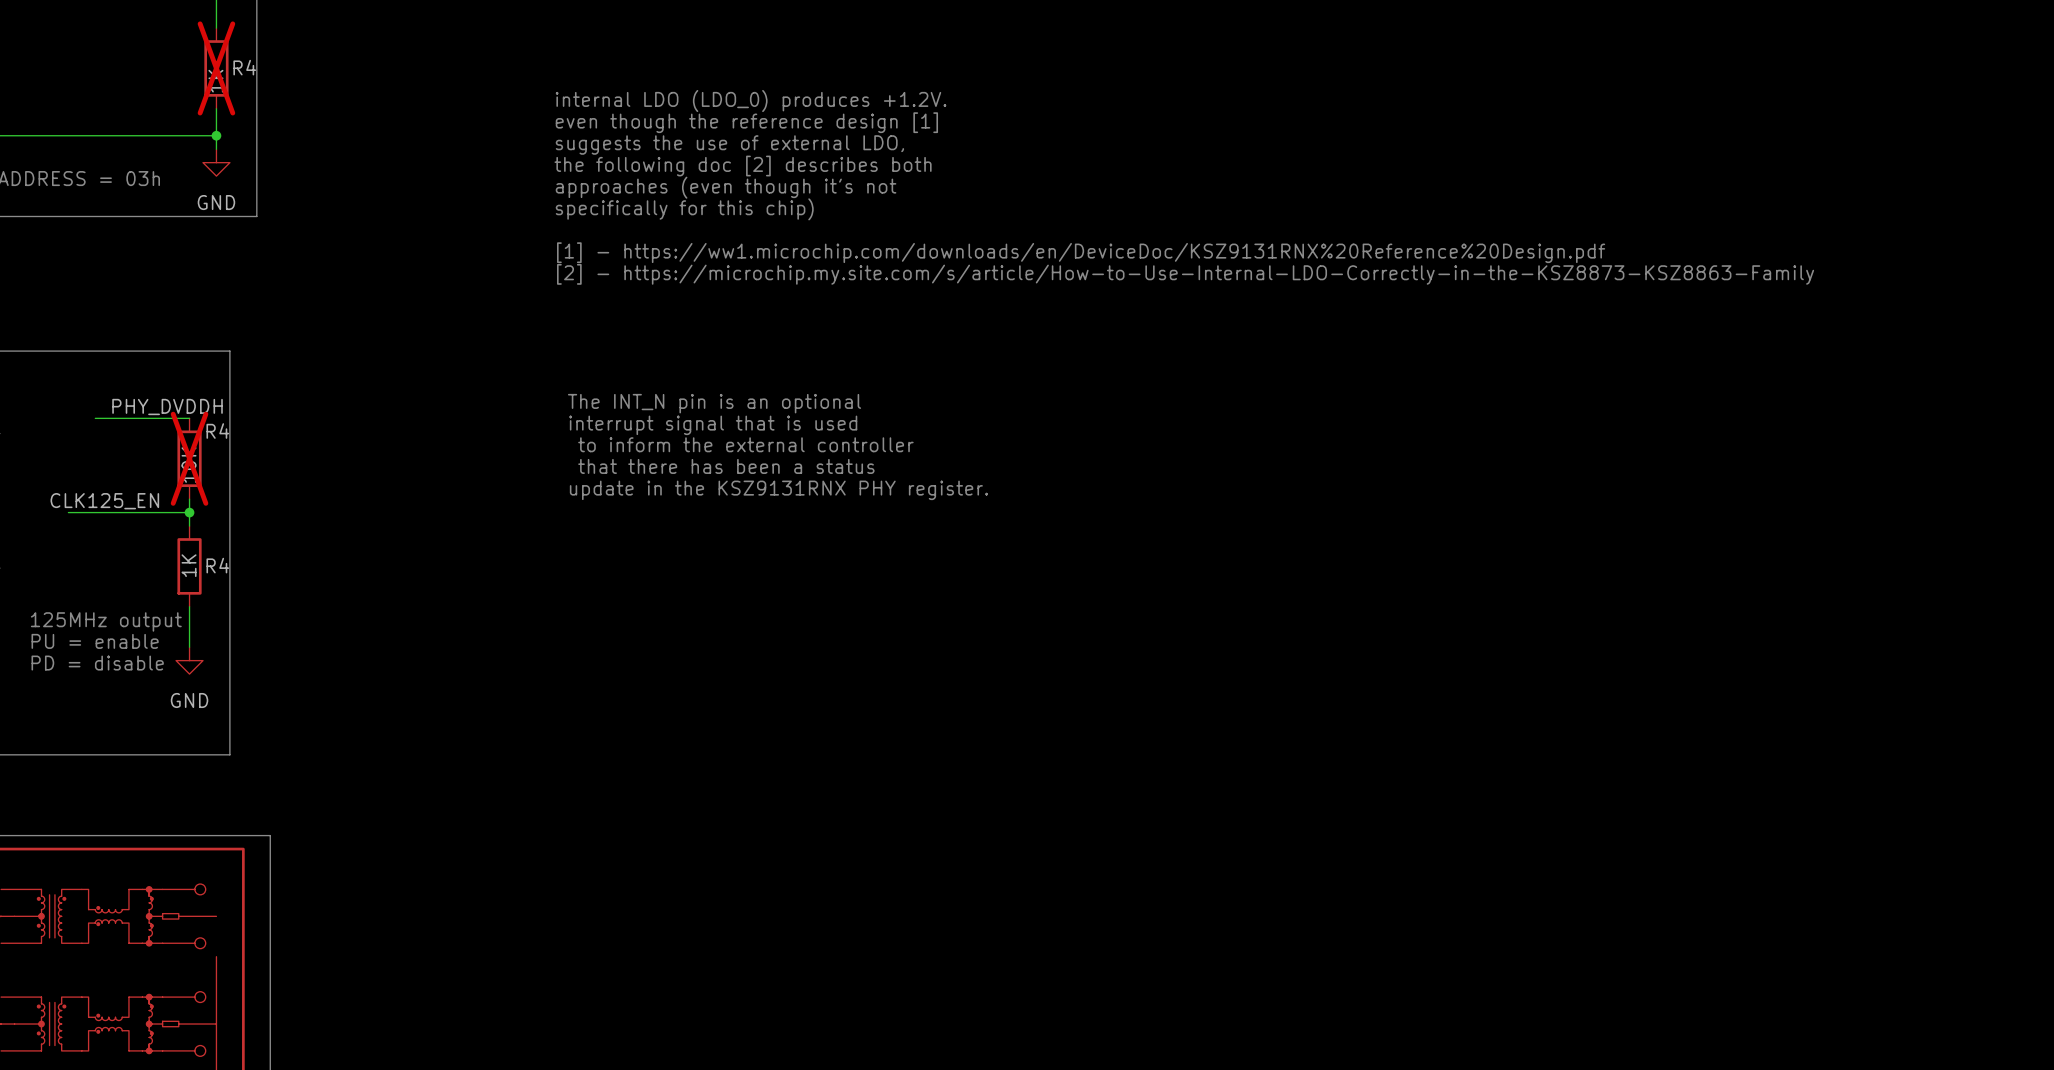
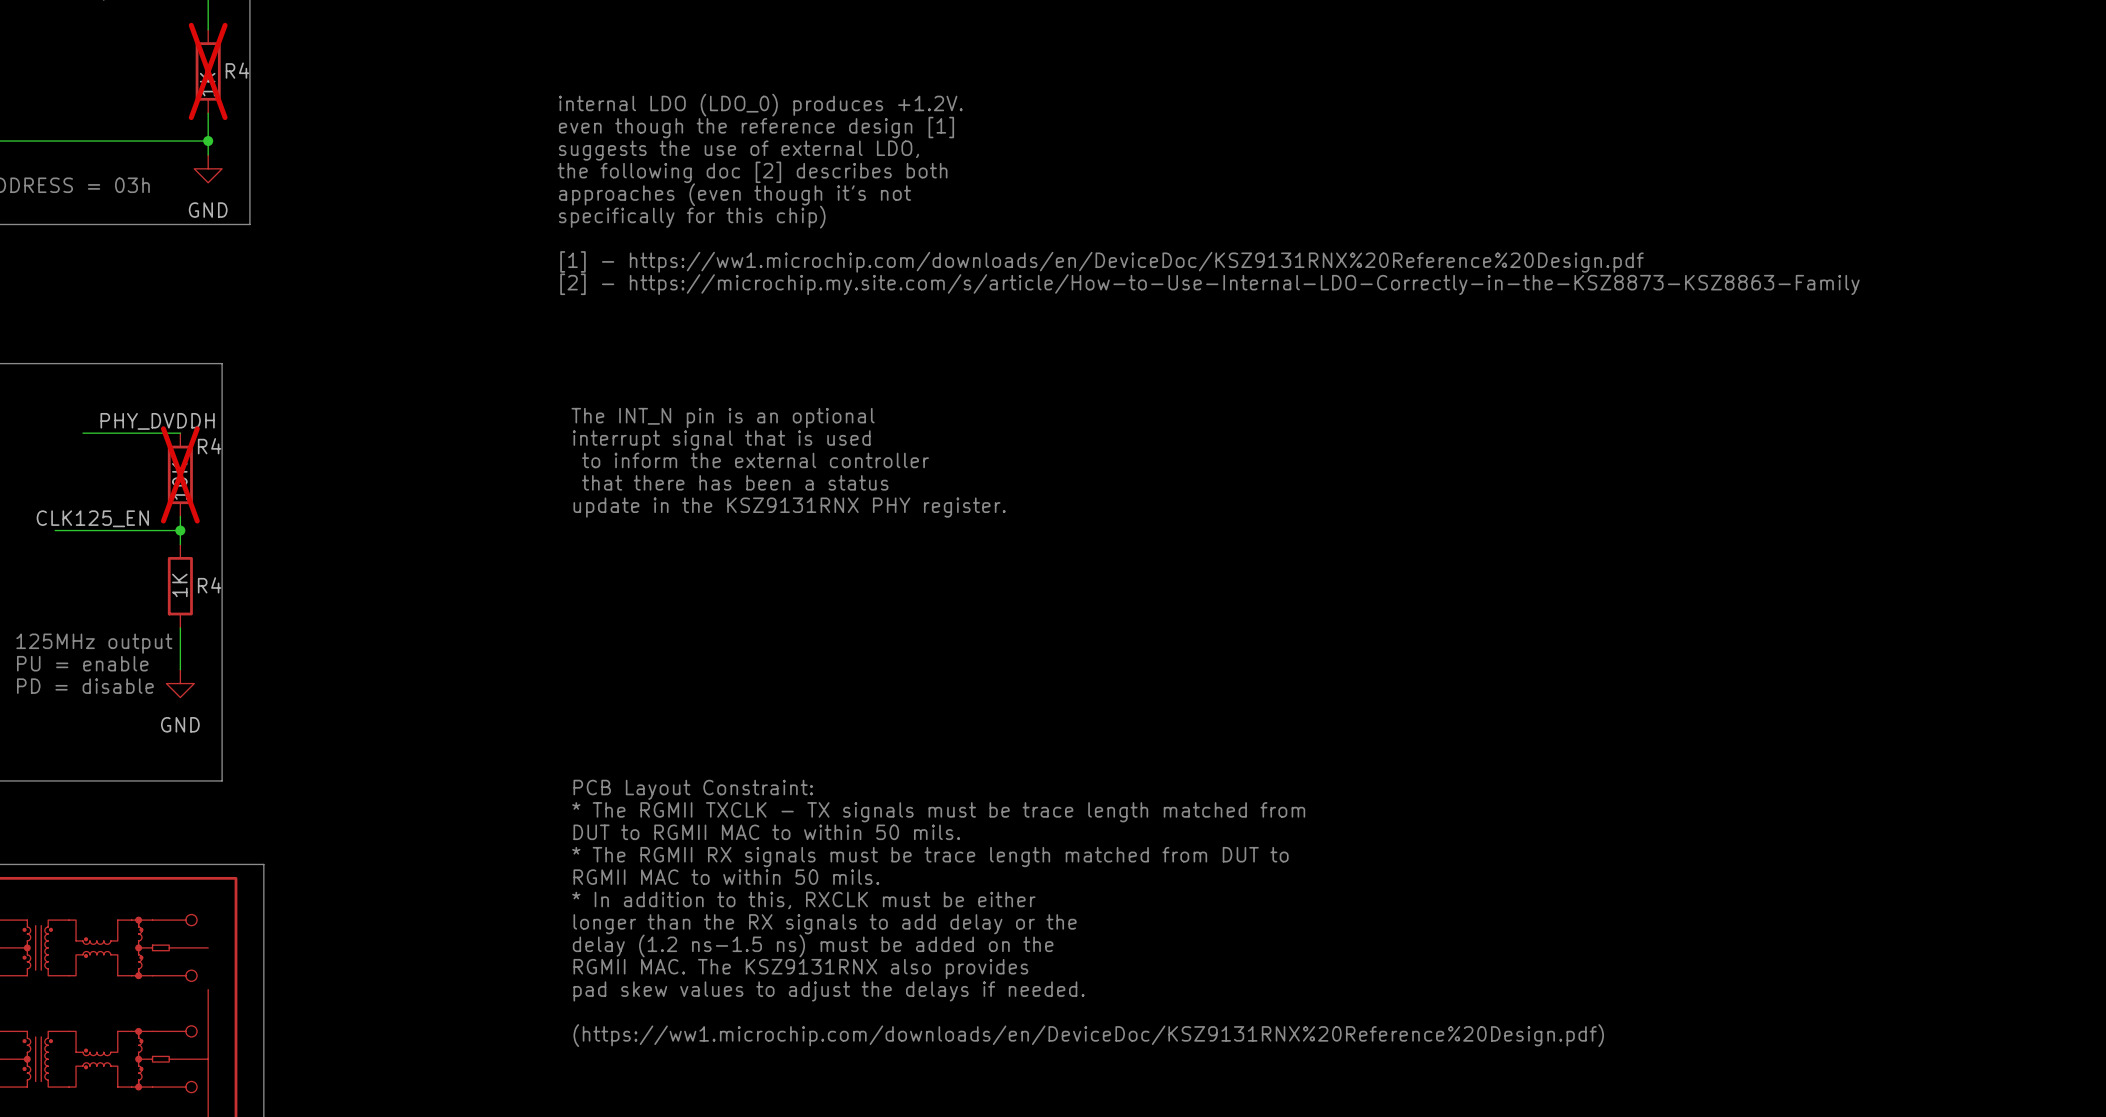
text: none -> PCB Layout Constraint: (693, 789)
text: none -> * The RGMII TXCLK - TX signals must be trace length matched from (938, 812)
text: none -> DUT to RGMII MAC to within 50 mils. (766, 832)
text: none -> * The RGMII RX signals must be trace length matched from DUT to (930, 857)
text: none -> RGMII MAC to within 50 mils. (726, 877)
text: none -> * In addition to this, RXCLK must be either (803, 900)
text: none -> longer than the RX signals to add delay or the (825, 924)
text: none -> delay (1.2 ns-1.5 ns) must be added on the (813, 945)
text: none -> RGMII MAC. The KSZ9131RNX also provides (800, 969)
text: none -> pad skew values to adjust the delays if needed. (829, 991)
text: none -> (https://ww1.microchip.com/downloads/en/DeviceDoc/KSZ9131RNX%20Reference%20Design.pdf) (1088, 1035)

